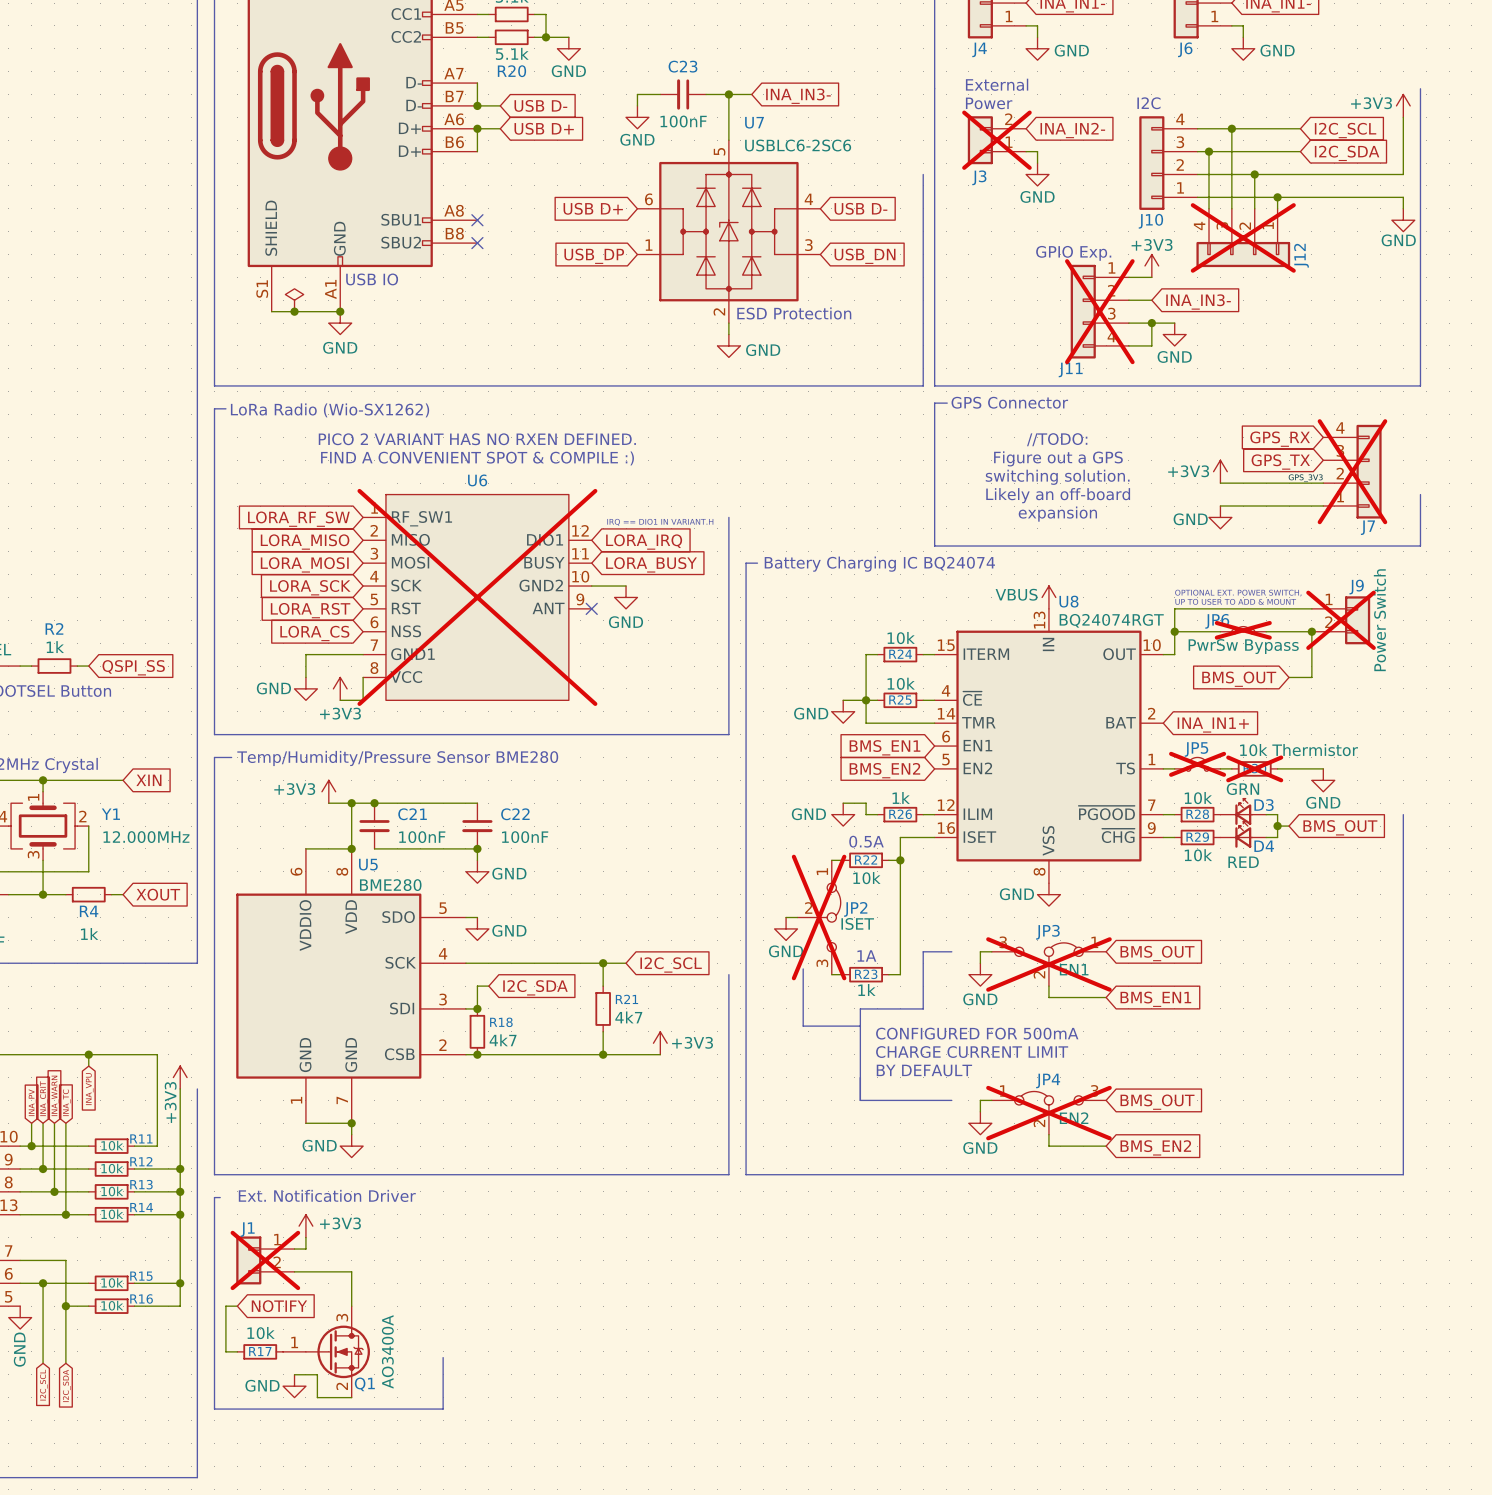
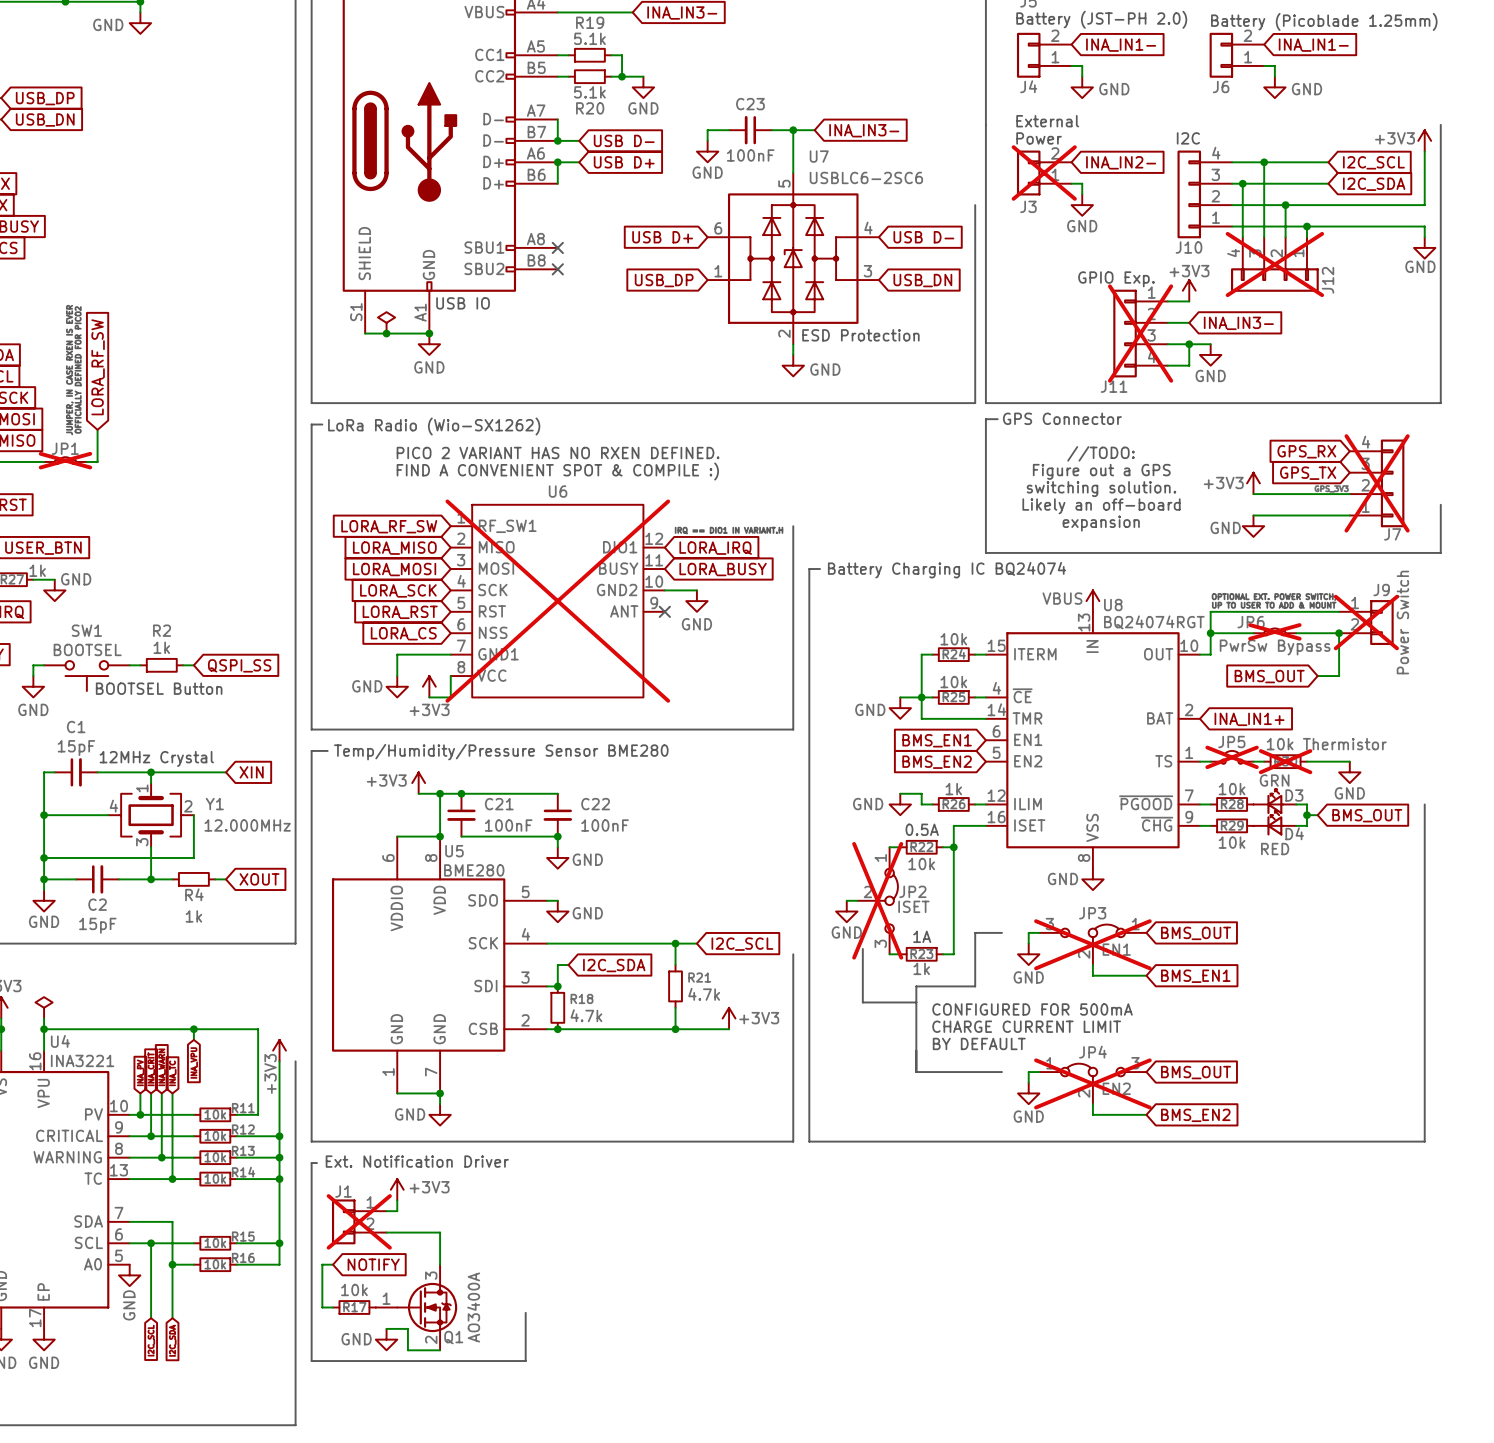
R21 value: 4k7 (628, 1017) -> 4.7k (704, 994)
R18 value: 4k7 (503, 1040) -> 4.7k (586, 1015)

